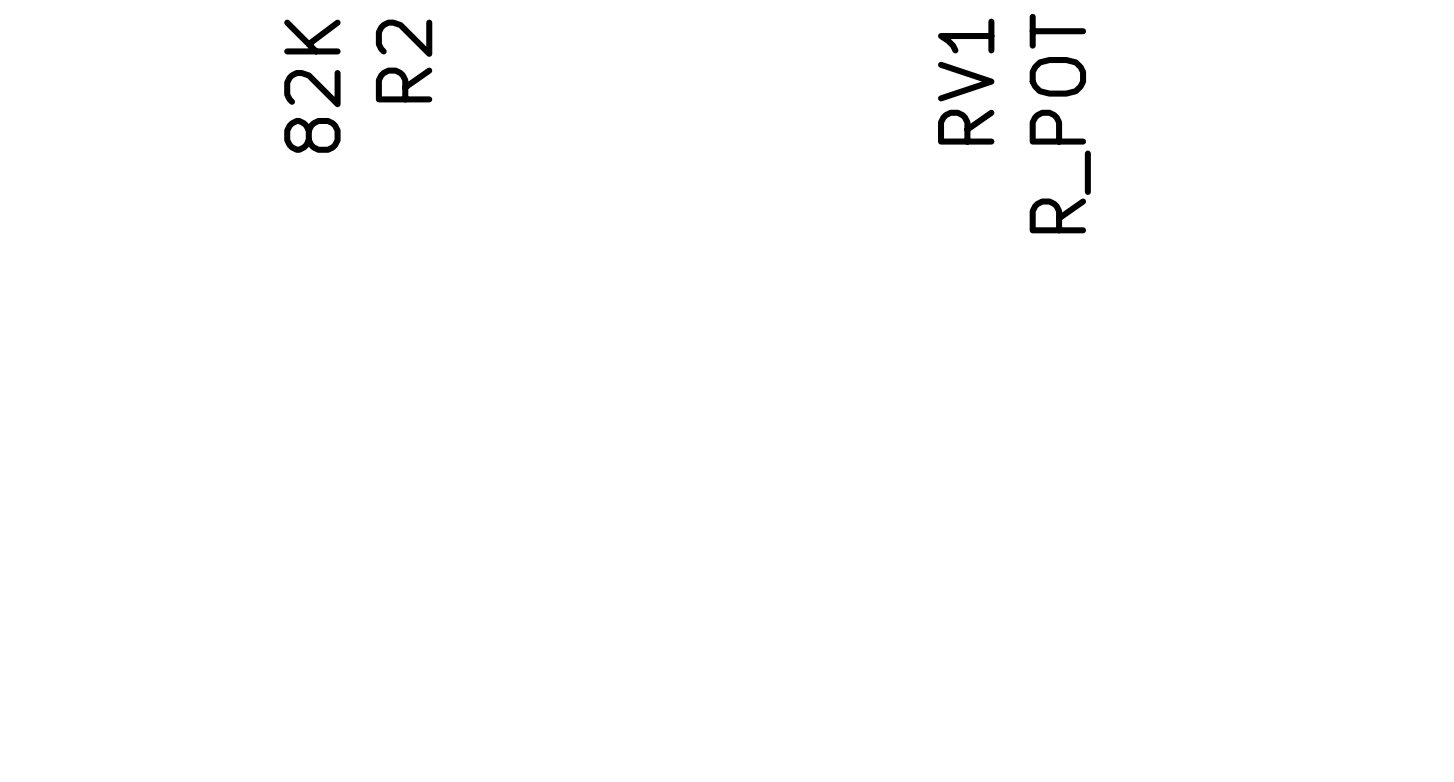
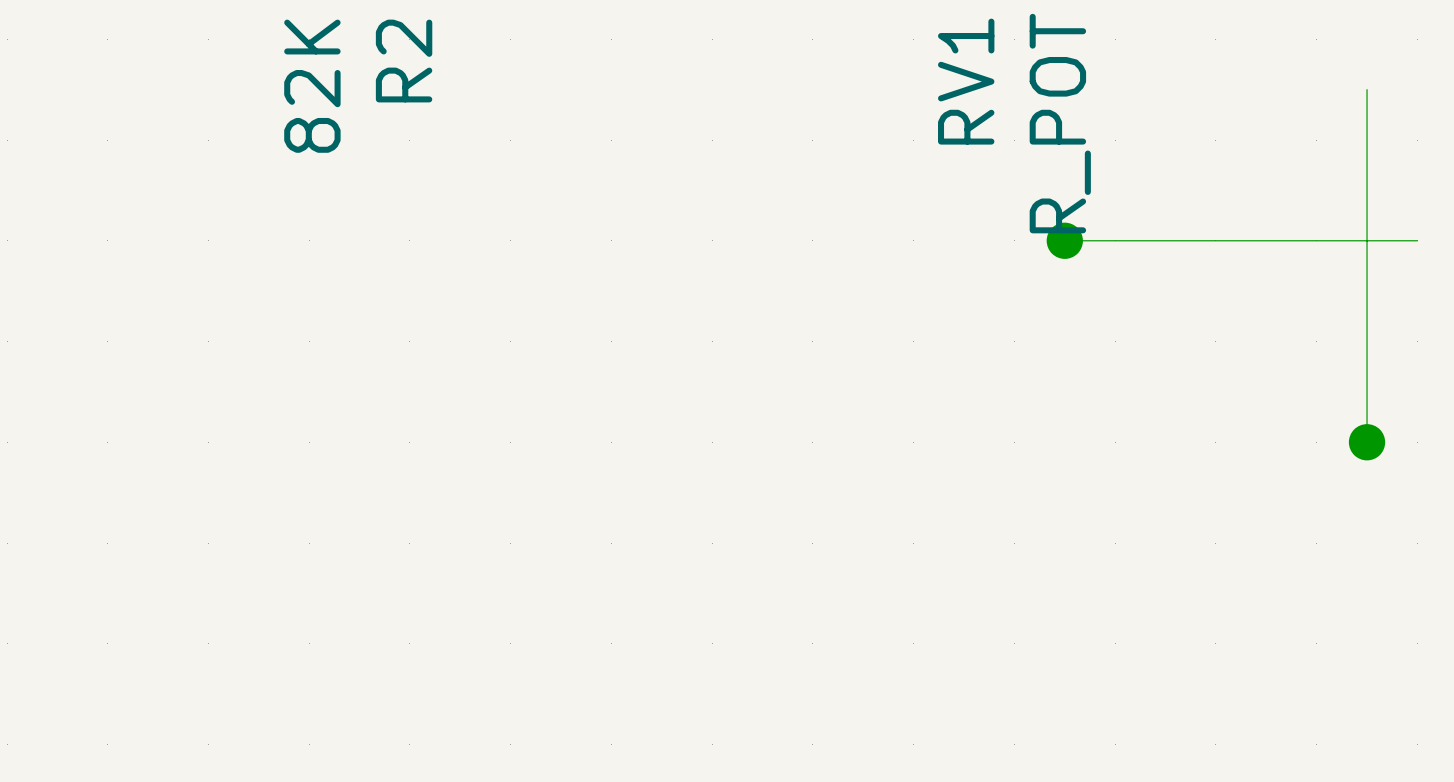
wire: none -> (1367, 89) (1367, 442)
wire: none -> (1064, 240) (1417, 240)
junction: none -> (1064, 240)
junction: none -> (1367, 442)

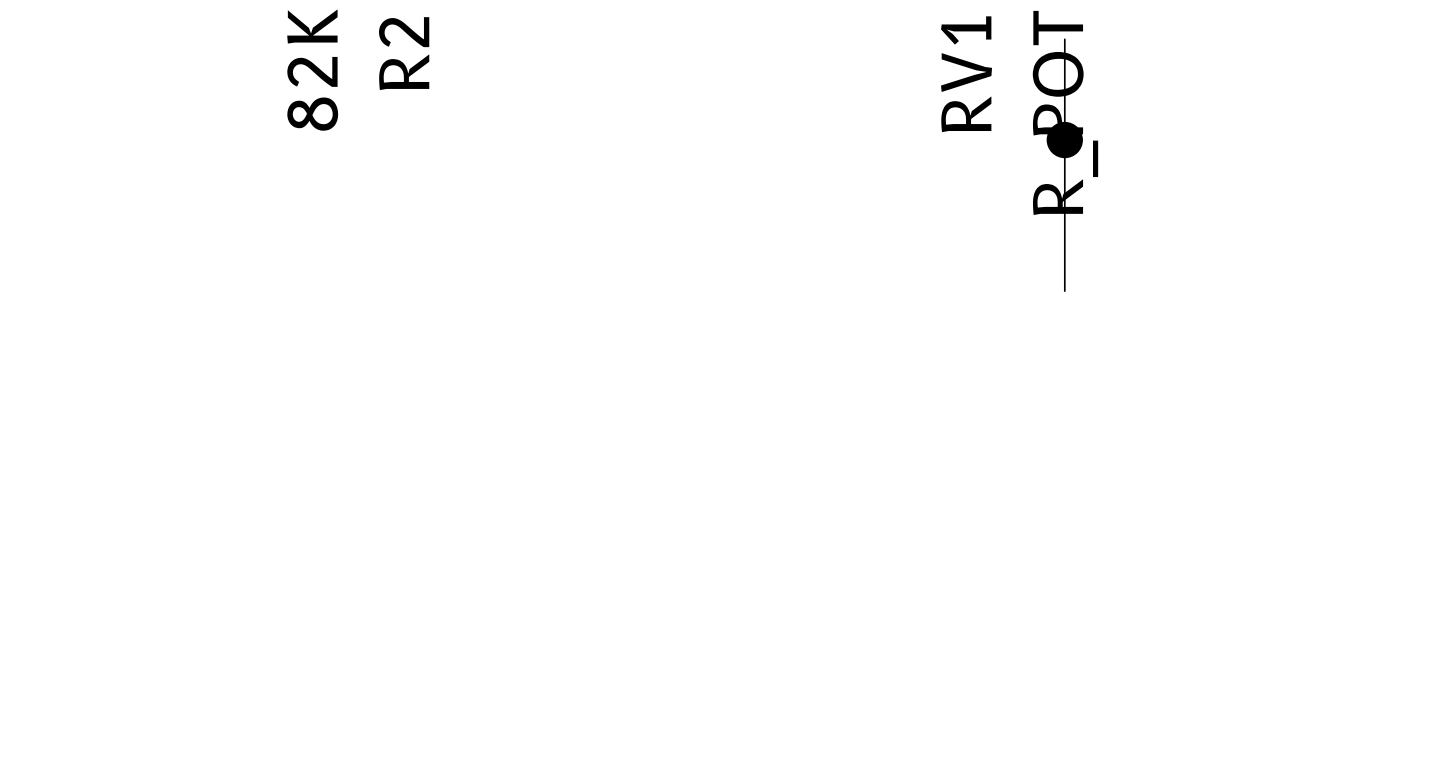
wire: none -> (1064, 39) (1064, 291)
wire: (1367, 89) (1367, 442) -> none
wire: (1064, 240) (1417, 240) -> none
junction position: (1064, 240) -> (1064, 140)
junction: (1367, 442) -> none

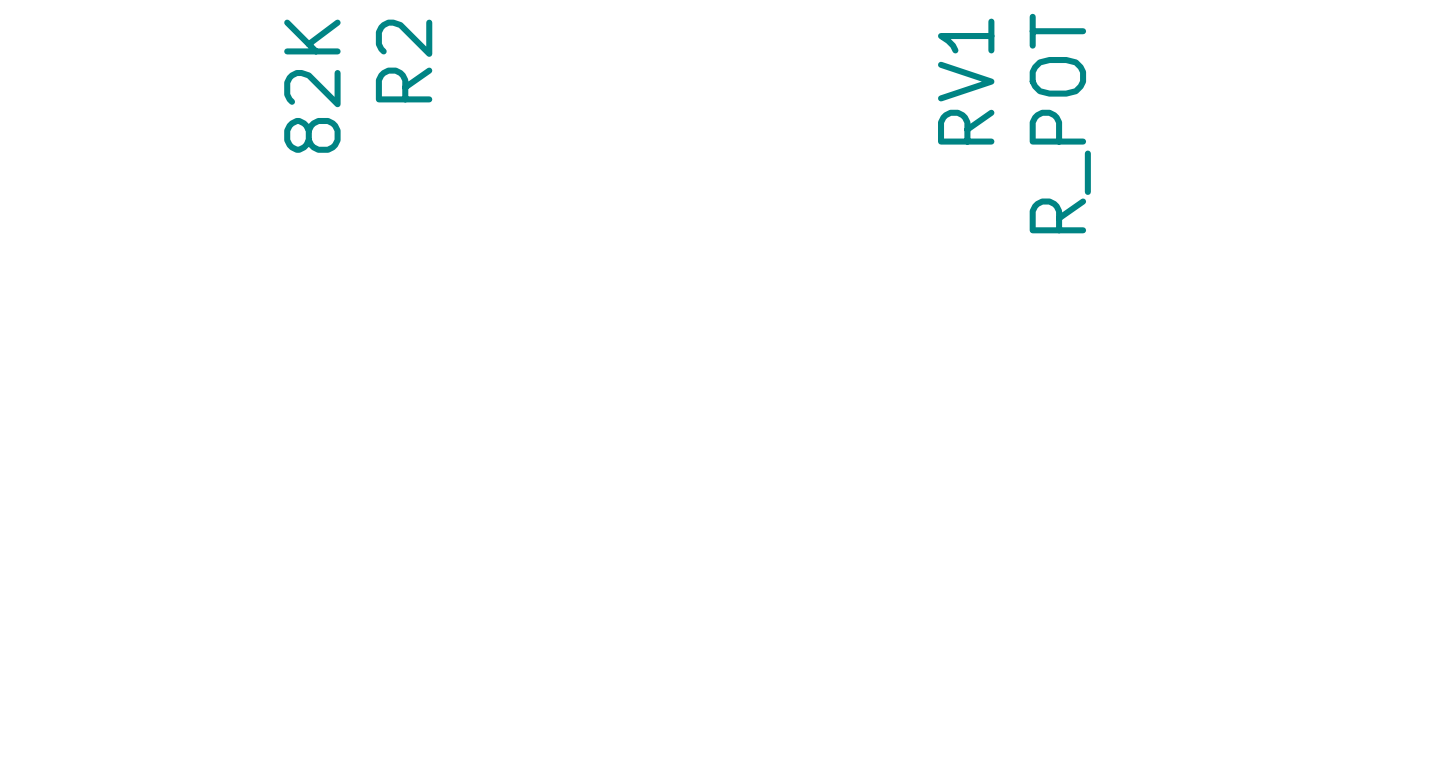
wire: (1064, 39) (1064, 291) -> none
junction: (1064, 140) -> none

